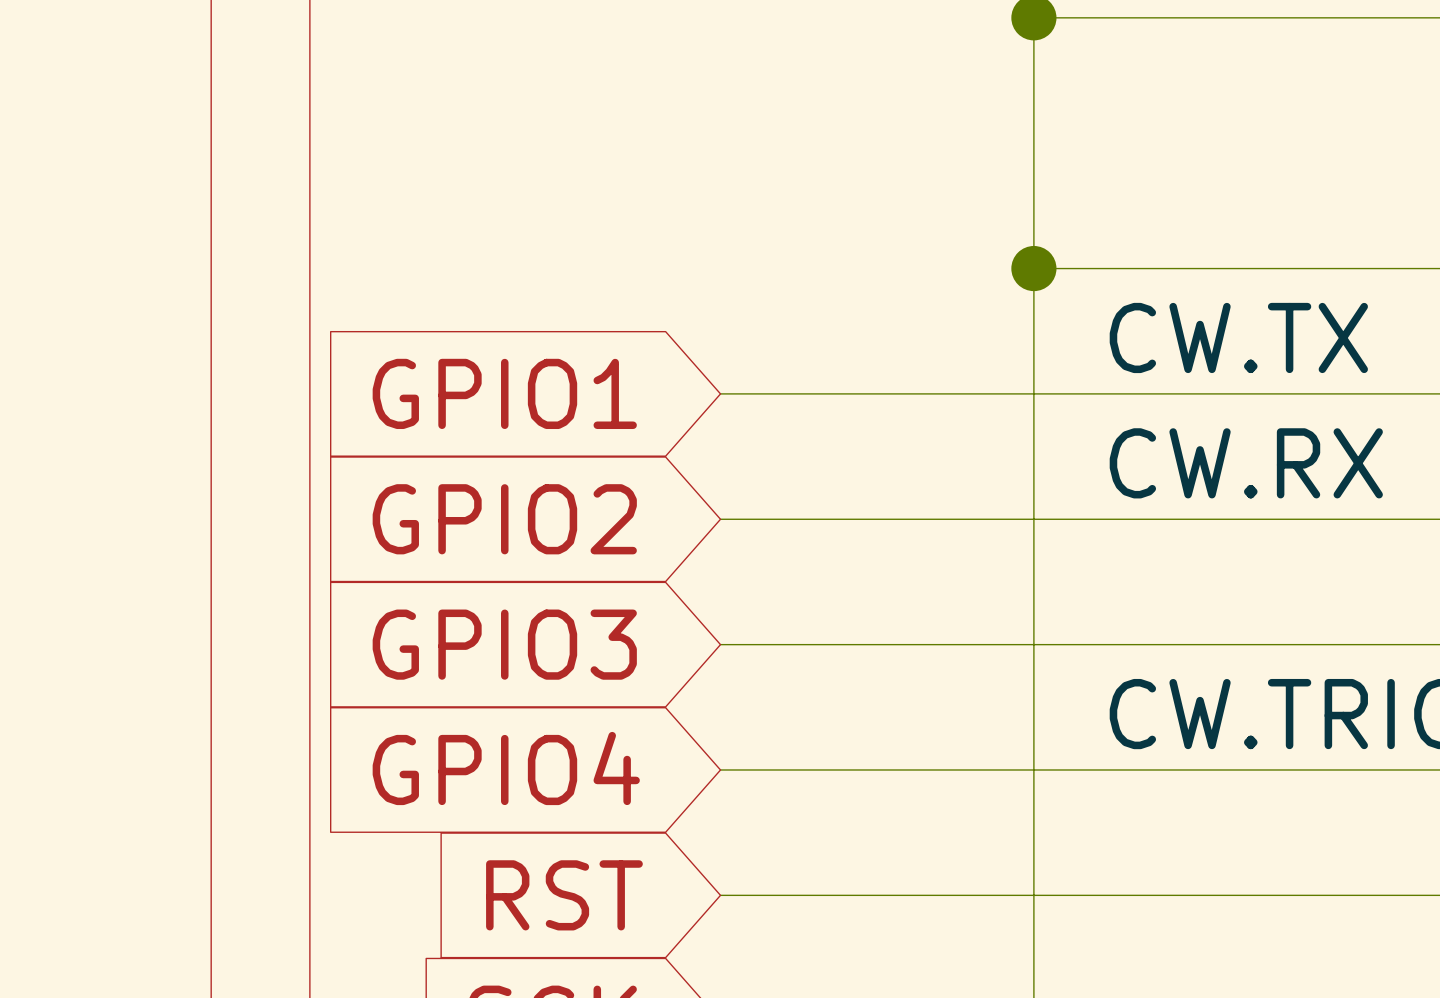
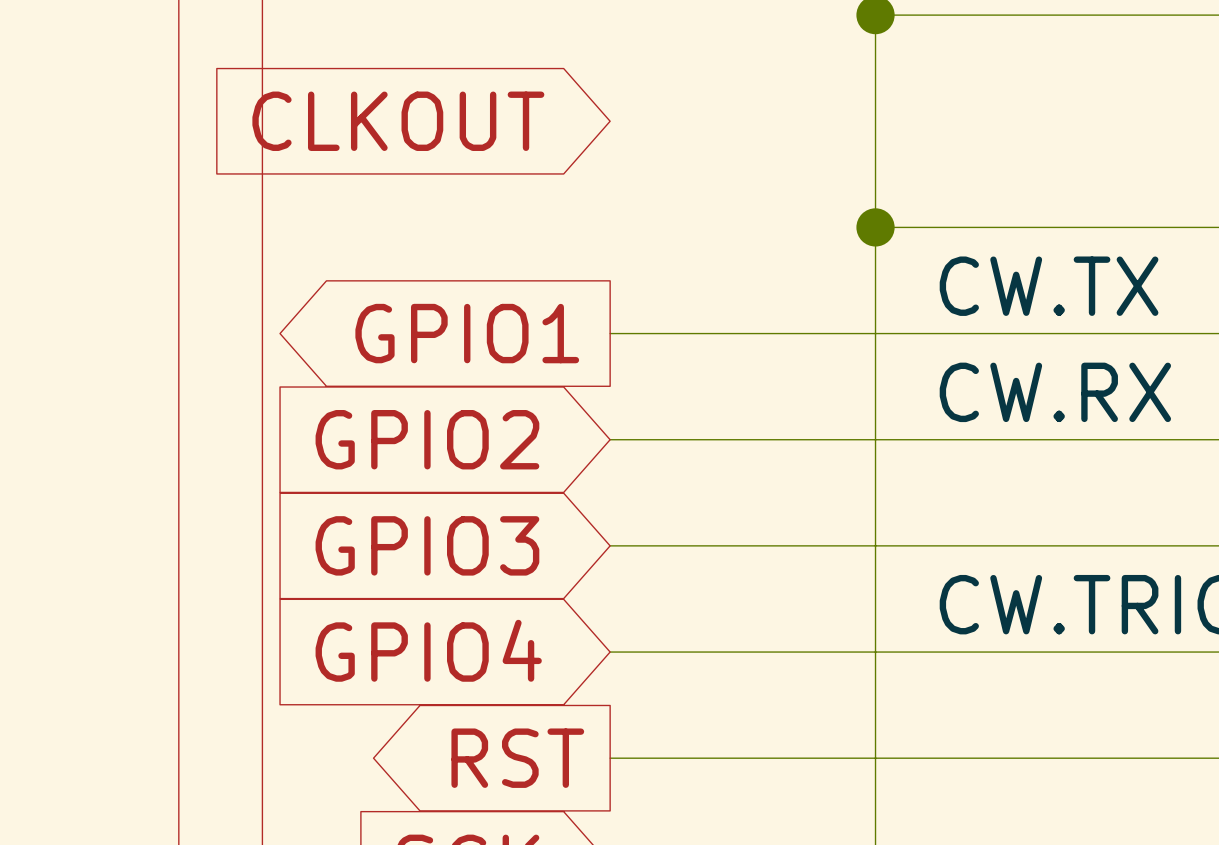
global label: none -> CLKOUT (398, 121)
global label shape: input (504, 393) -> output (467, 333)
global label shape: input (564, 895) -> output (517, 758)

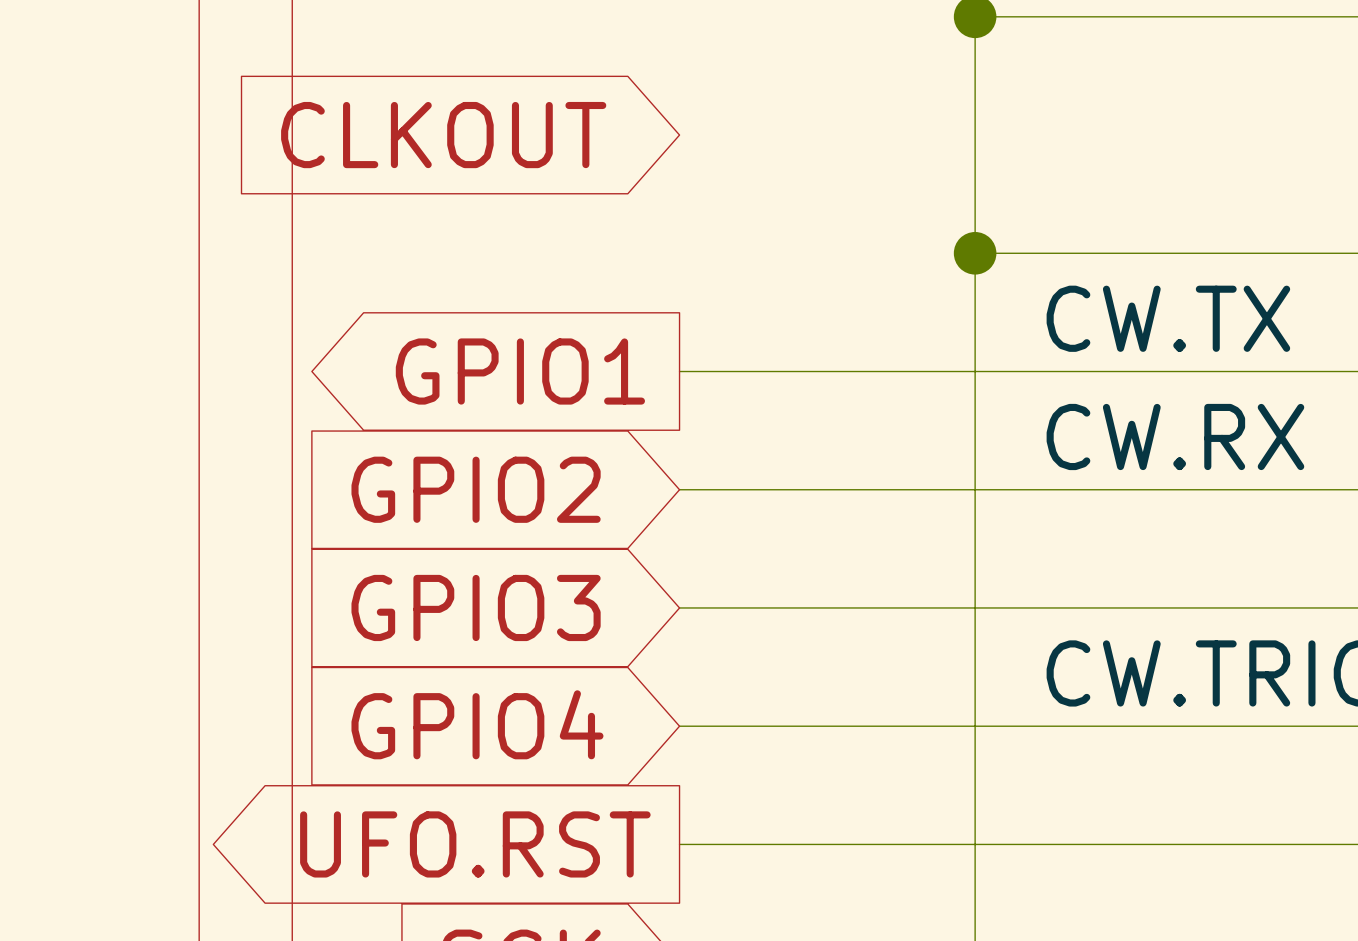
global label: RST (517, 758) -> UFO.RST (475, 844)

